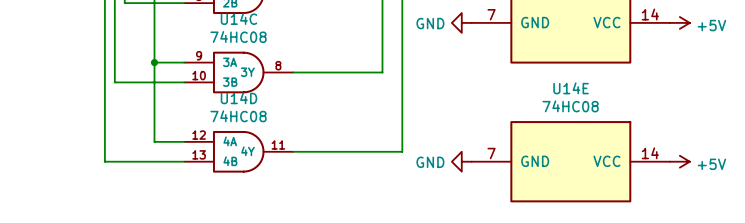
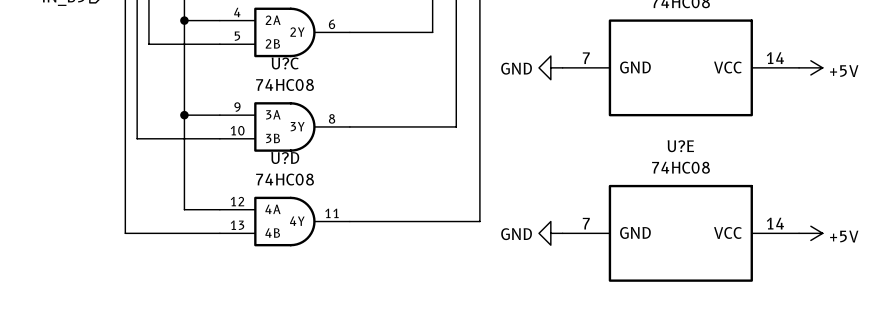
U14C name: U14C (238, 18) -> U?C (285, 63)
U14E name: U14E (571, 88) -> U?E (680, 146)
U14D name: U14D (238, 98) -> U?D (285, 158)

